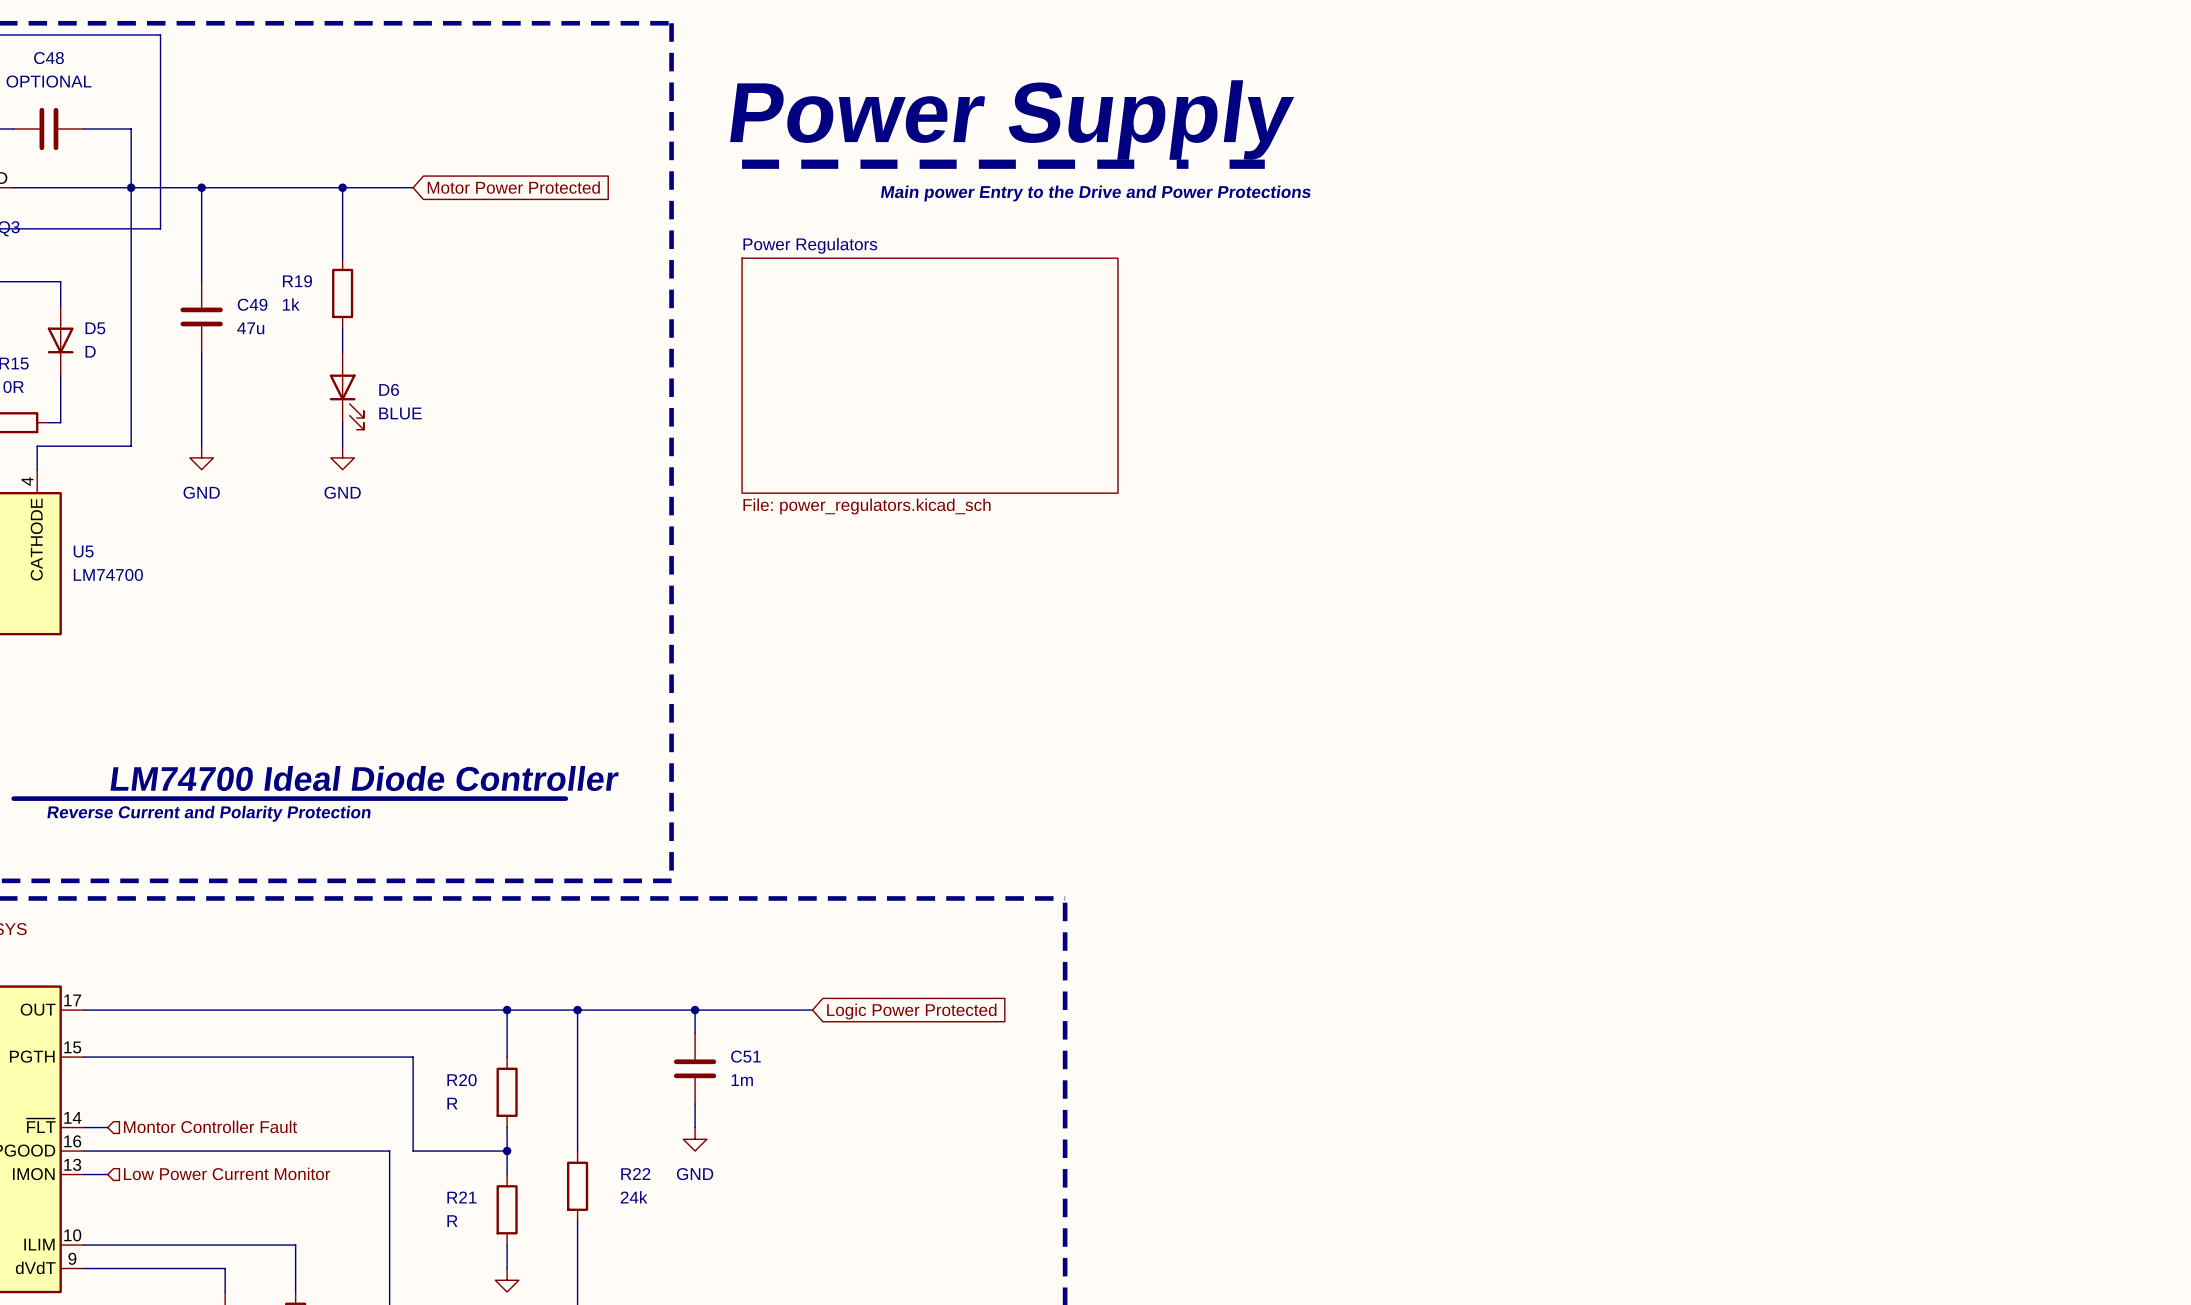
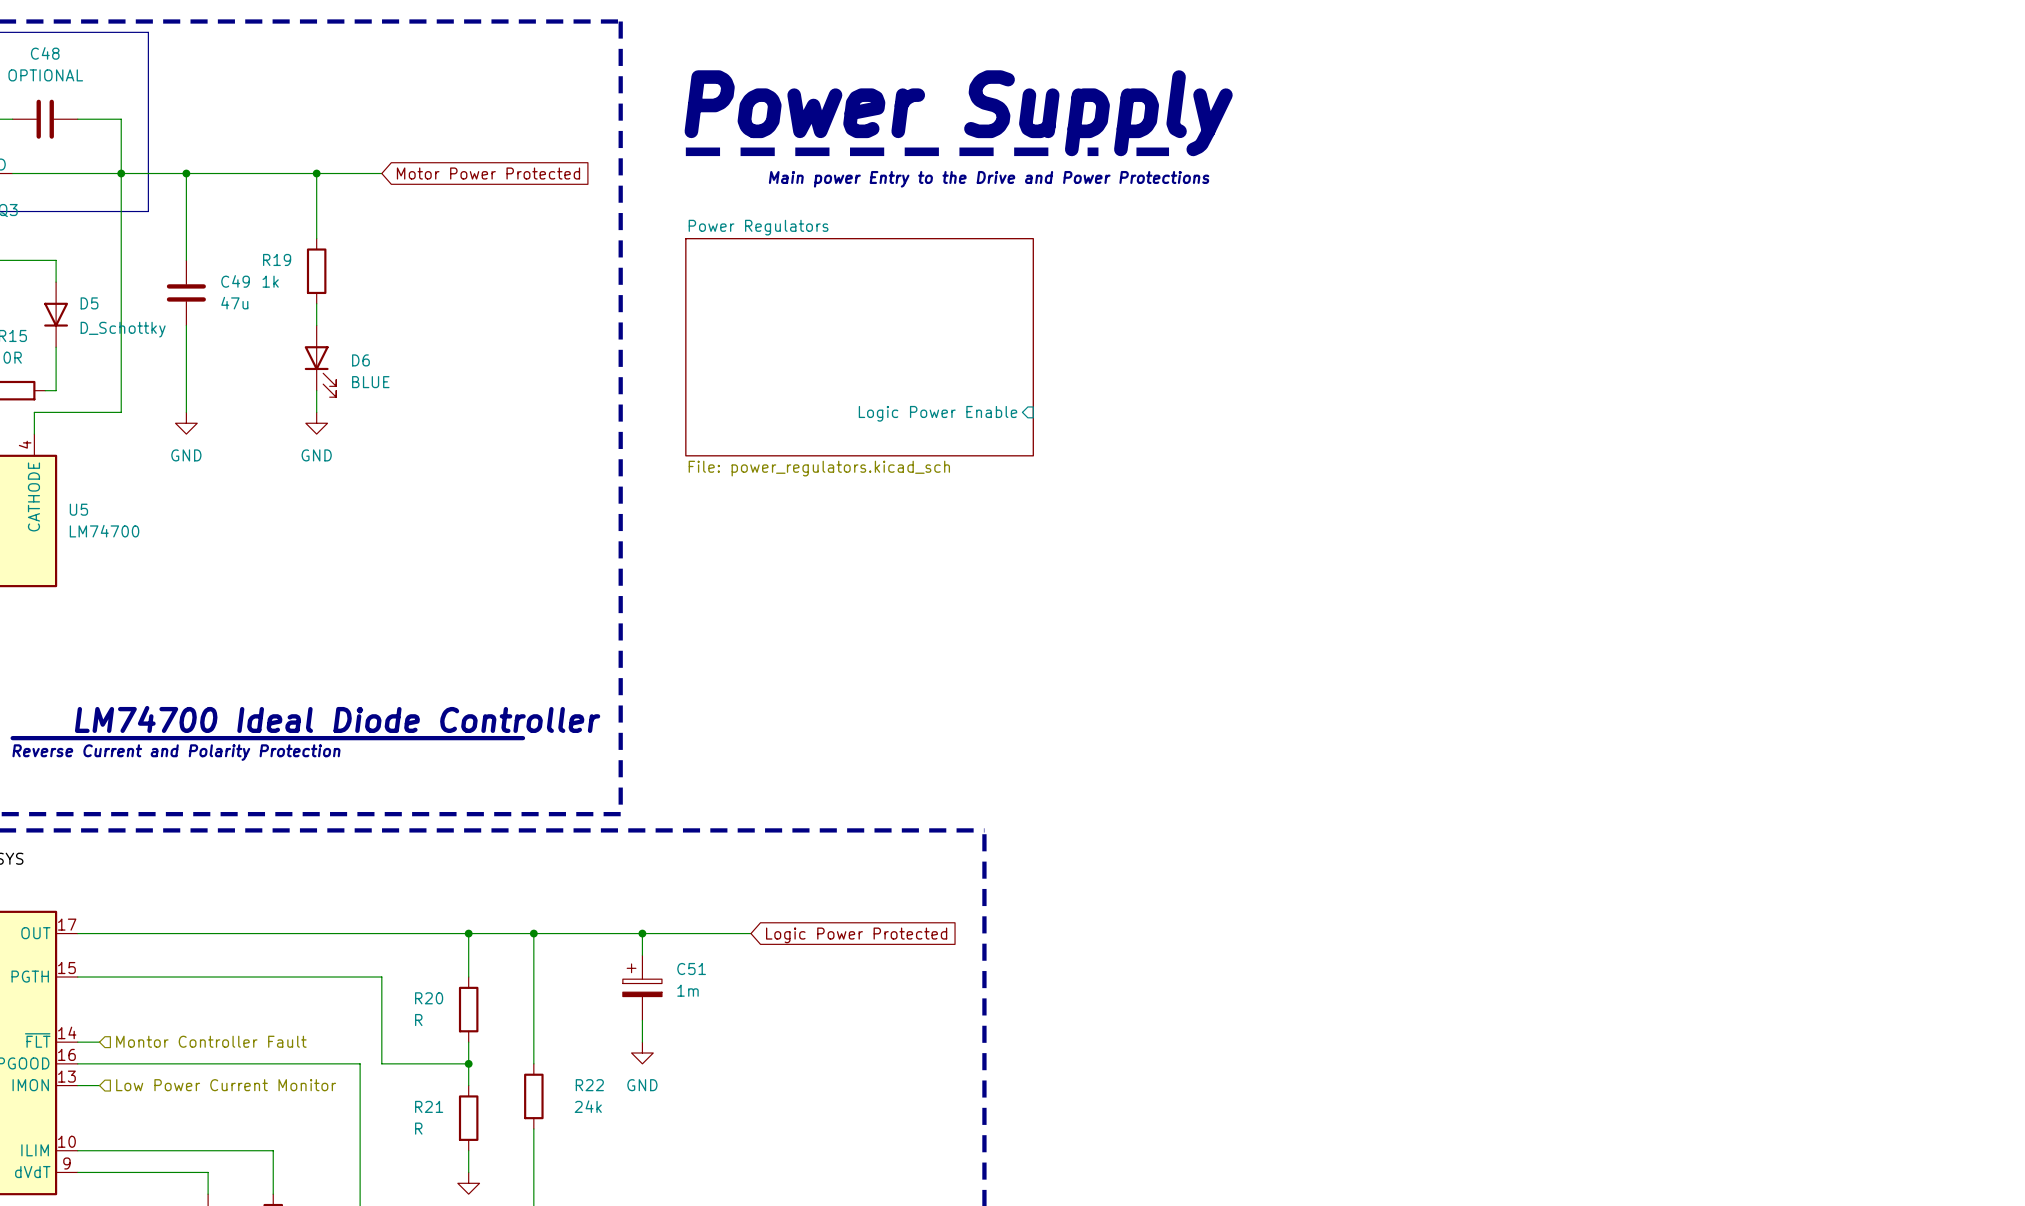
D5 value: D (90, 351) -> D_Schottky (123, 329)
sheet pin: none -> Logic Power Enable (937, 413)
C51 symbol: [673, 1033, 717, 1105] -> [622, 955, 662, 1021]

